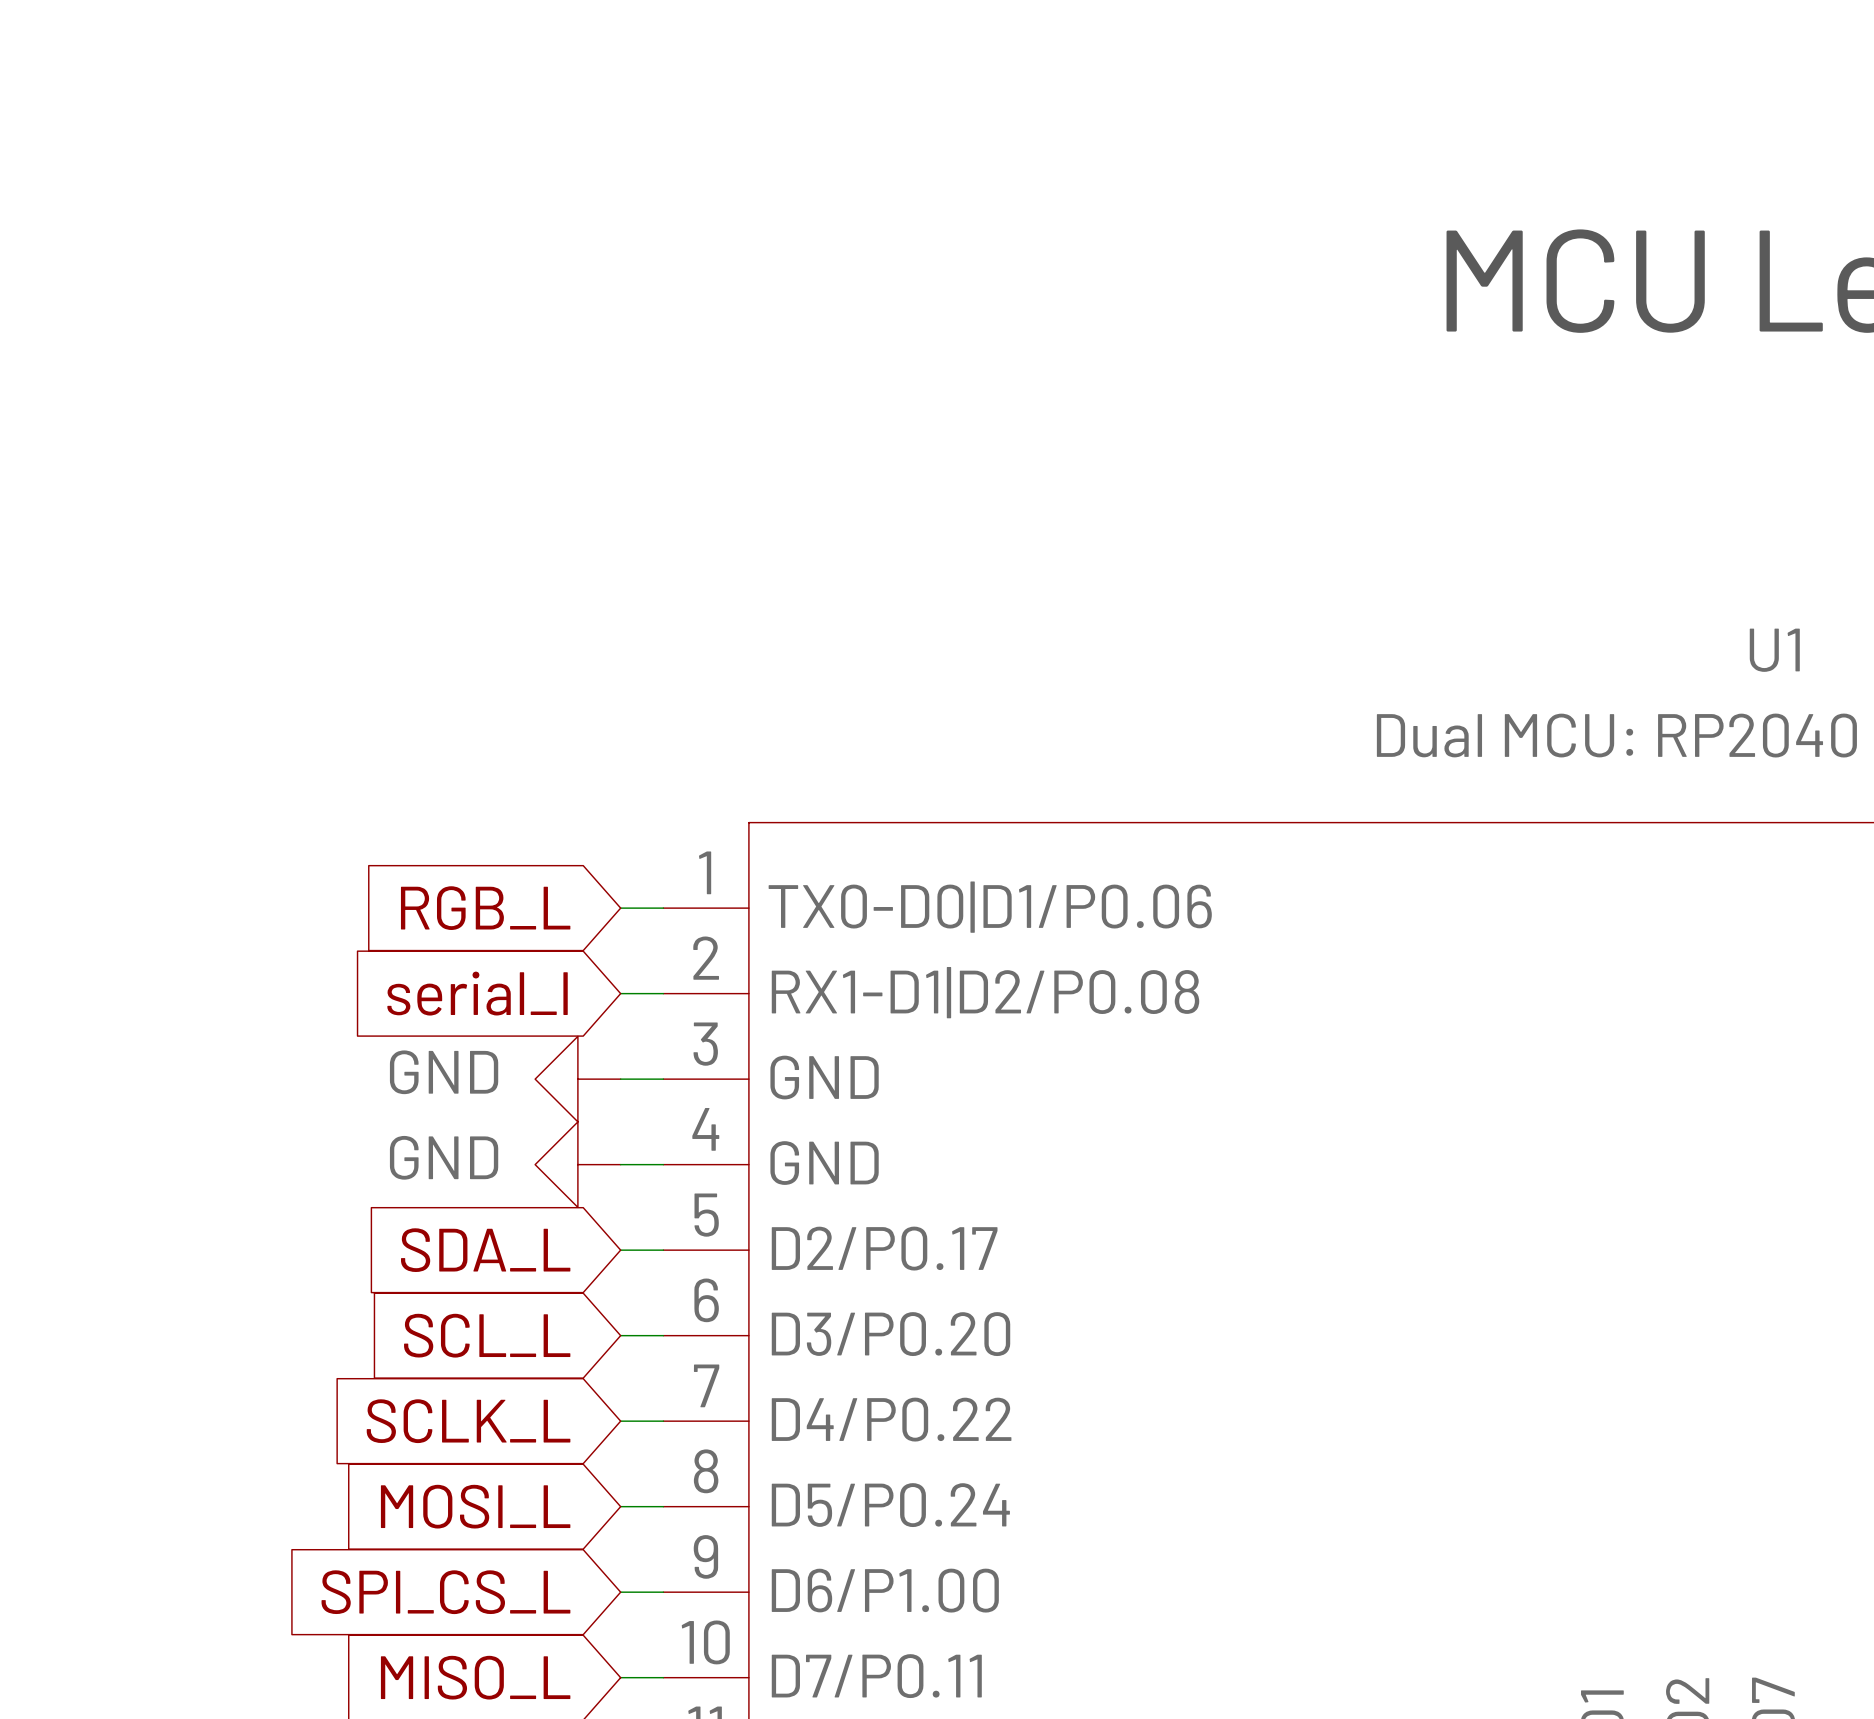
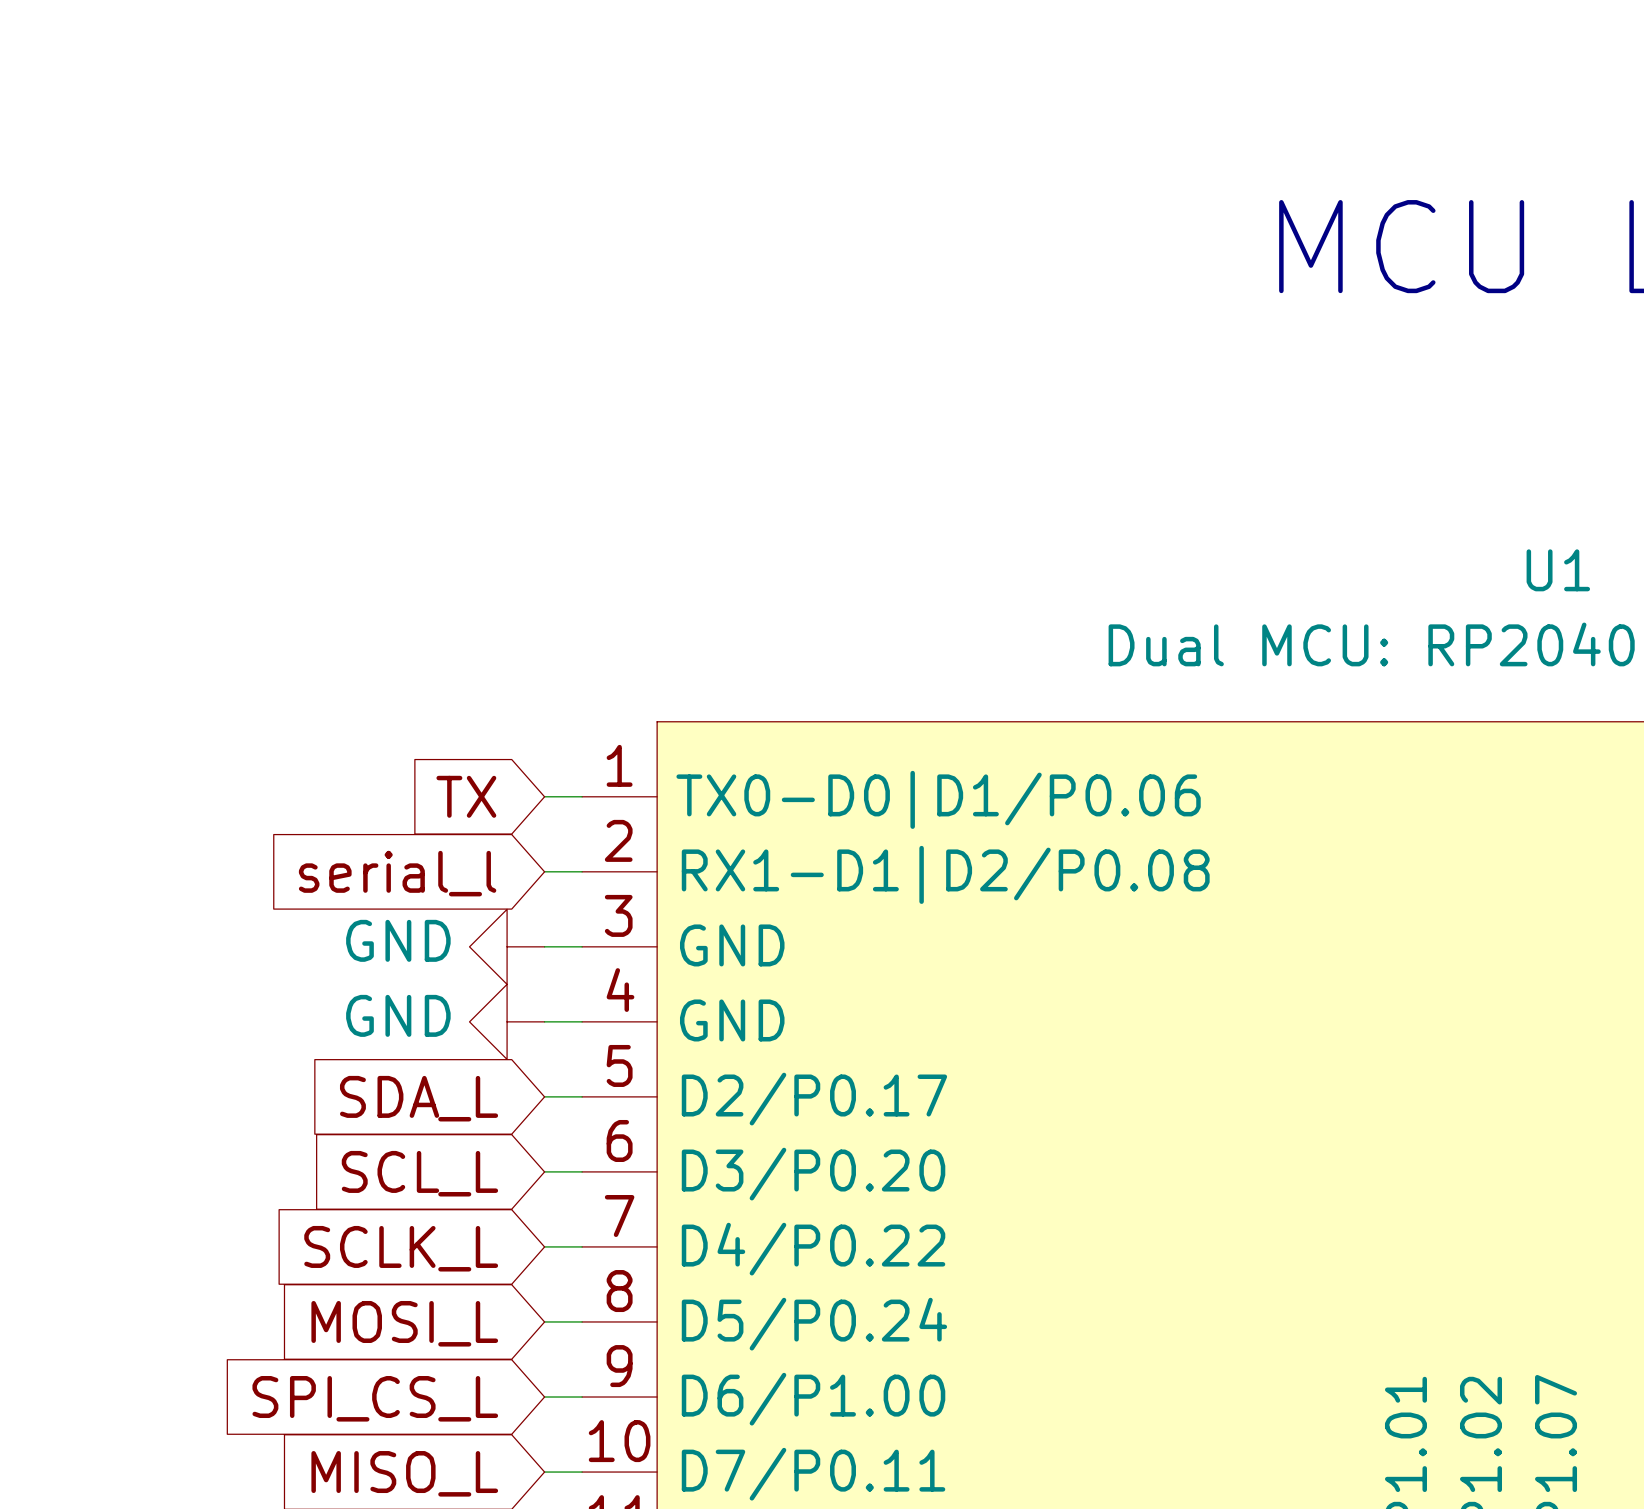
global label: RGB_L (485, 908) -> TX (466, 796)

